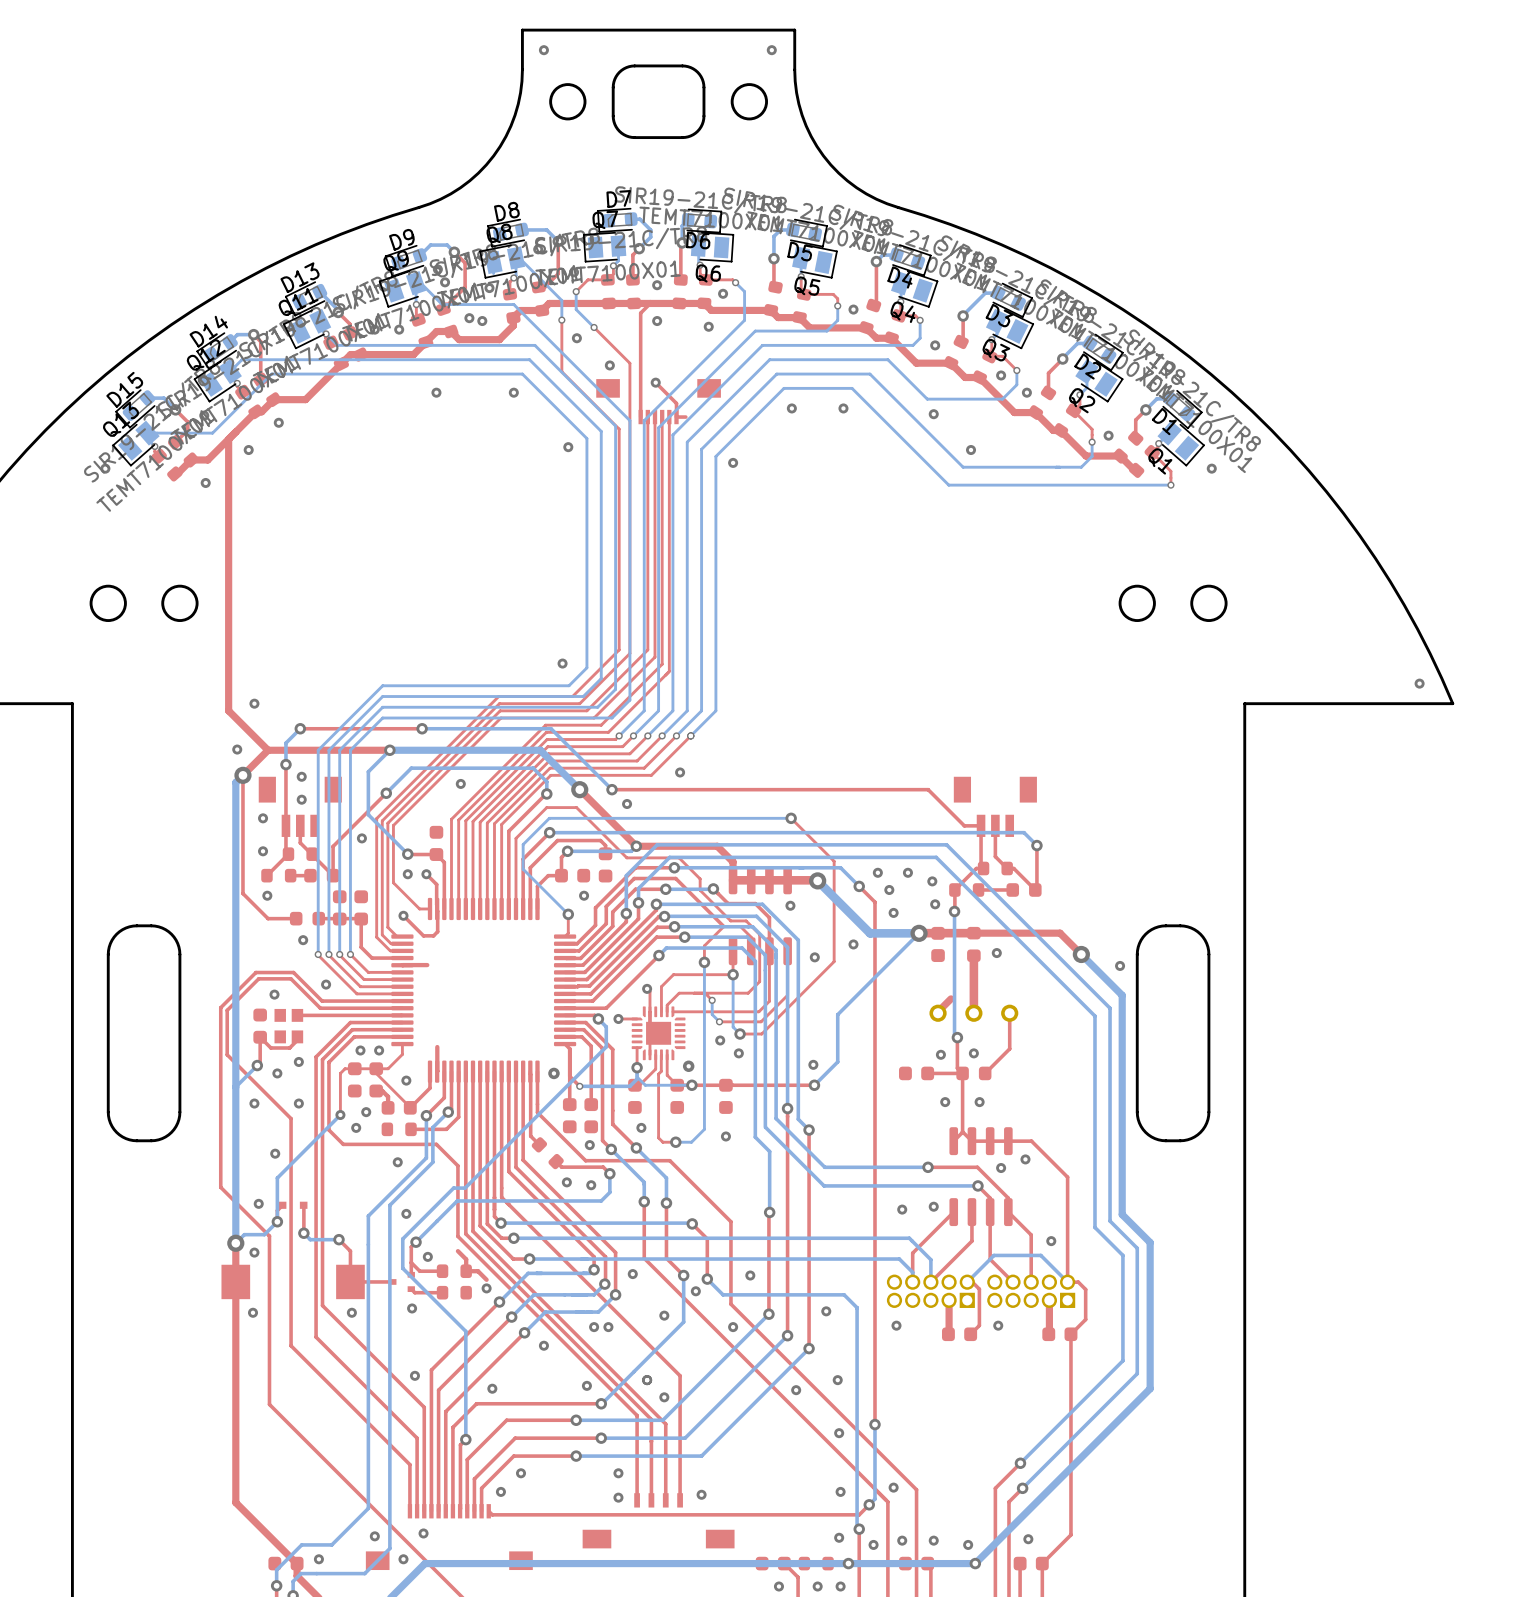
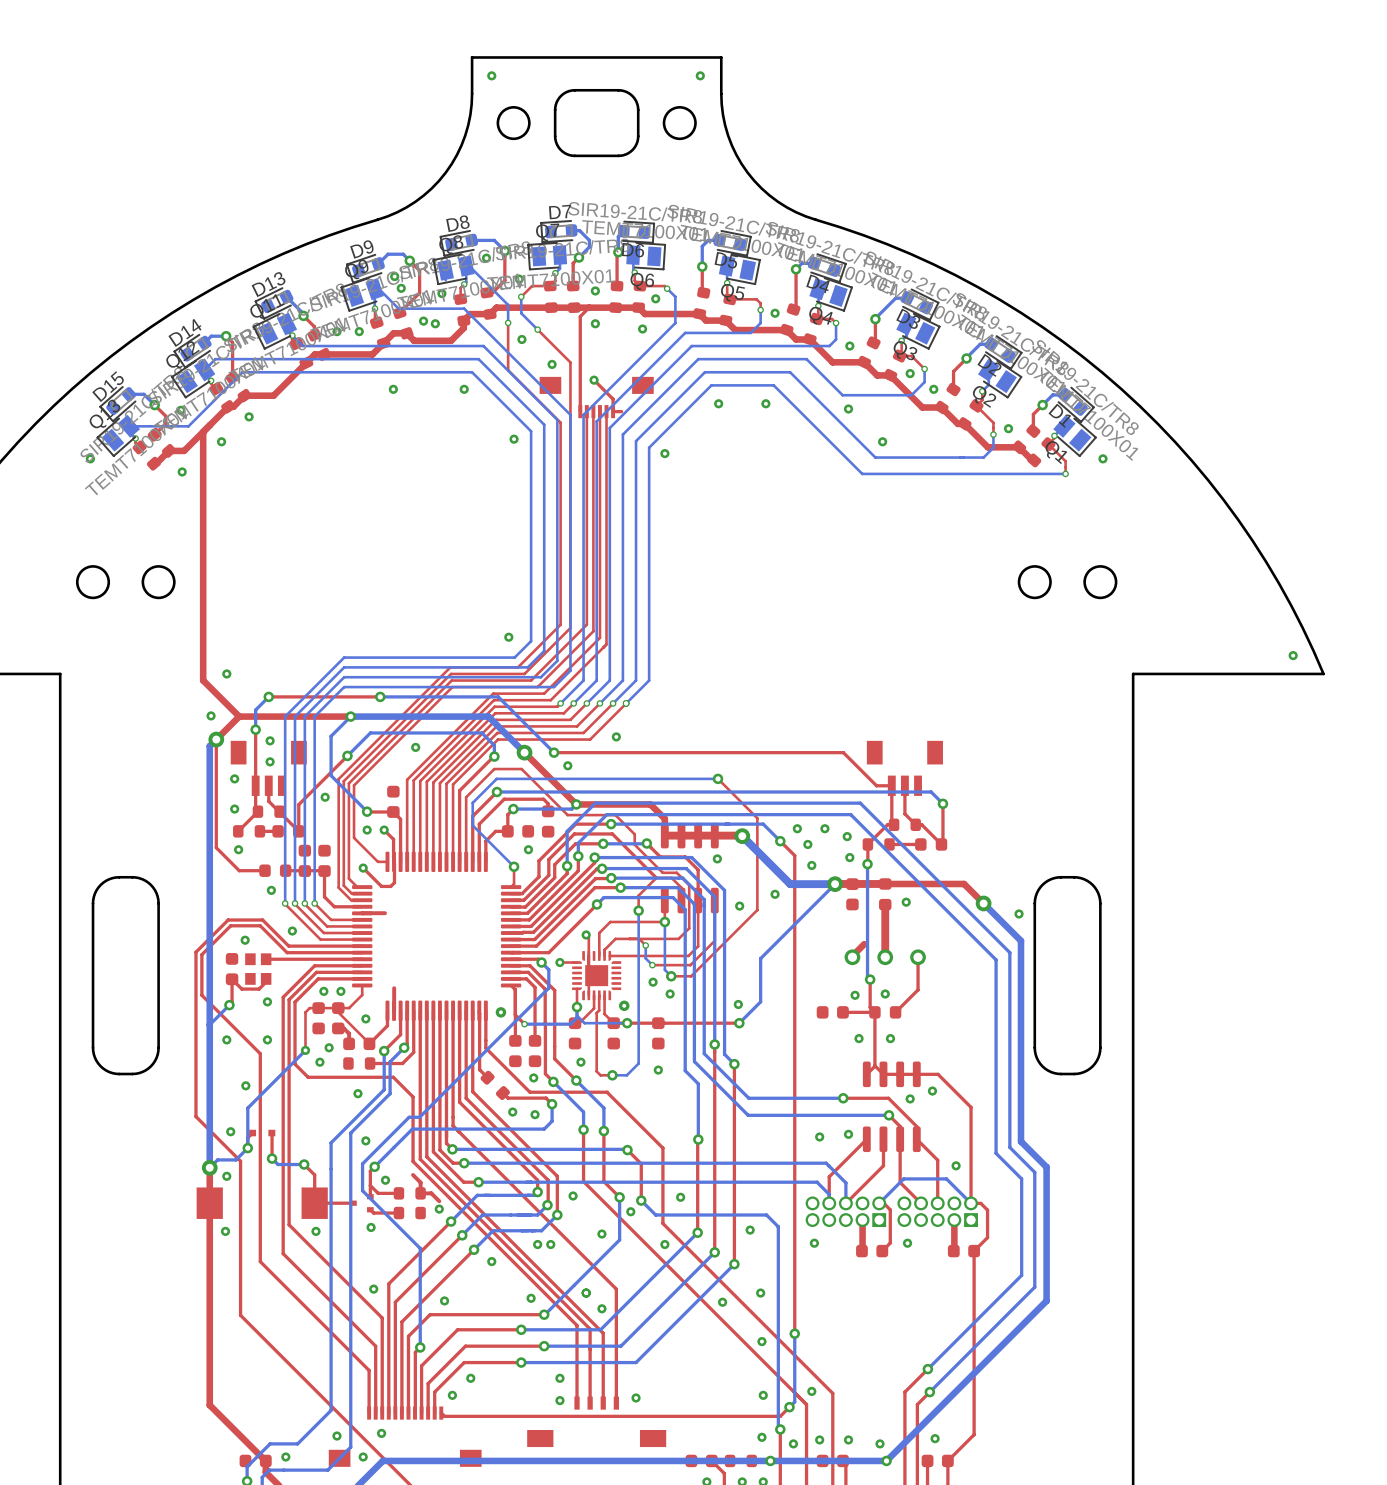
via: (277, 1073) -> none

